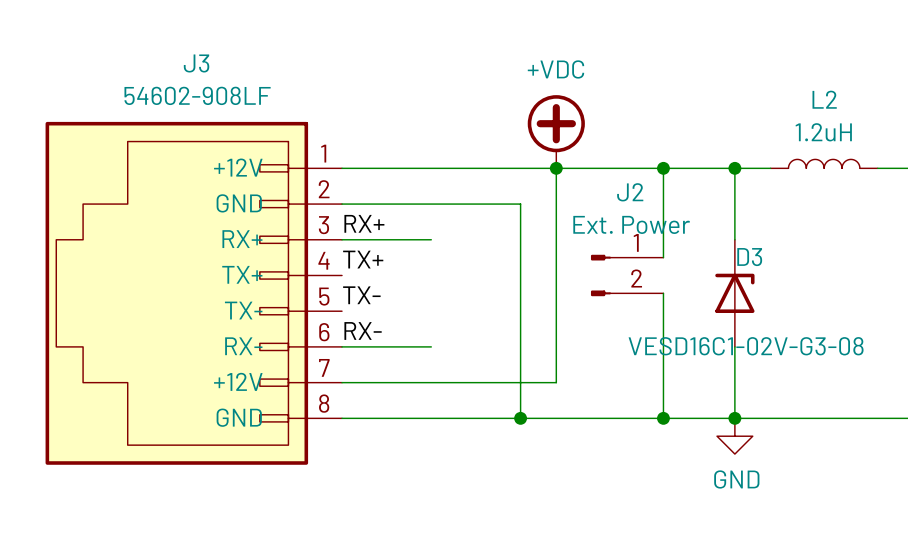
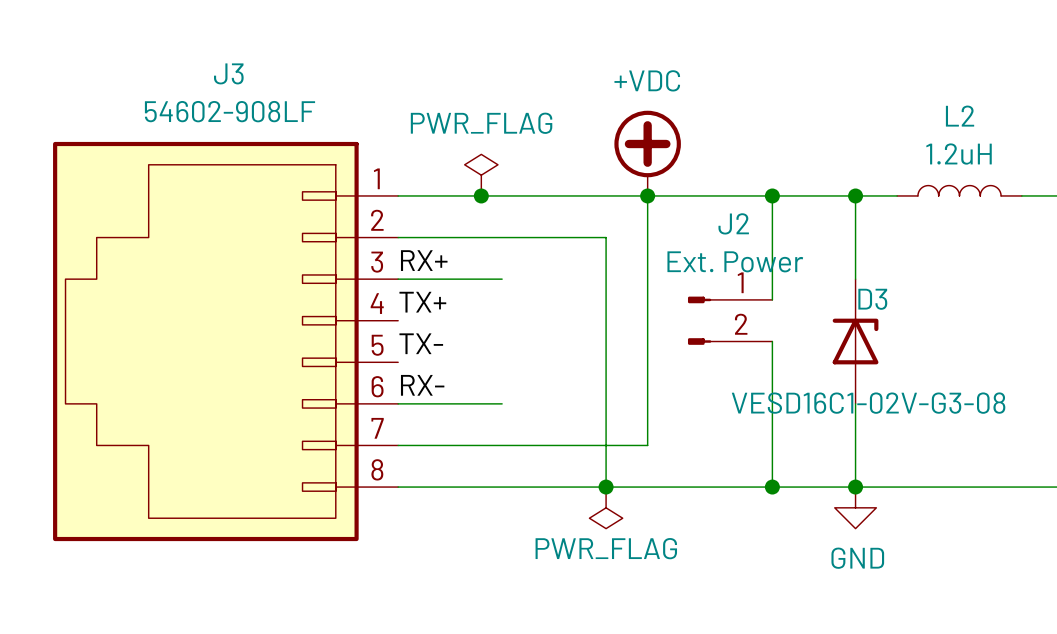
power symbol: none -> PWR_FLAG (481, 175)
J3 pin name: +12V (238, 167) -> none
junction: none -> (481, 195)
J3 pin name: GND (239, 203) -> none
J3 pin name: RX+ (242, 239) -> none
J3 pin name: TX+ (242, 274) -> none
J3 pin name: TX- (243, 310) -> none
J3 pin name: RX- (243, 346) -> none
J3 pin name: +12V (238, 381) -> none
J3 pin name: GND (239, 417) -> none
power symbol: none -> PWR_FLAG (606, 507)

